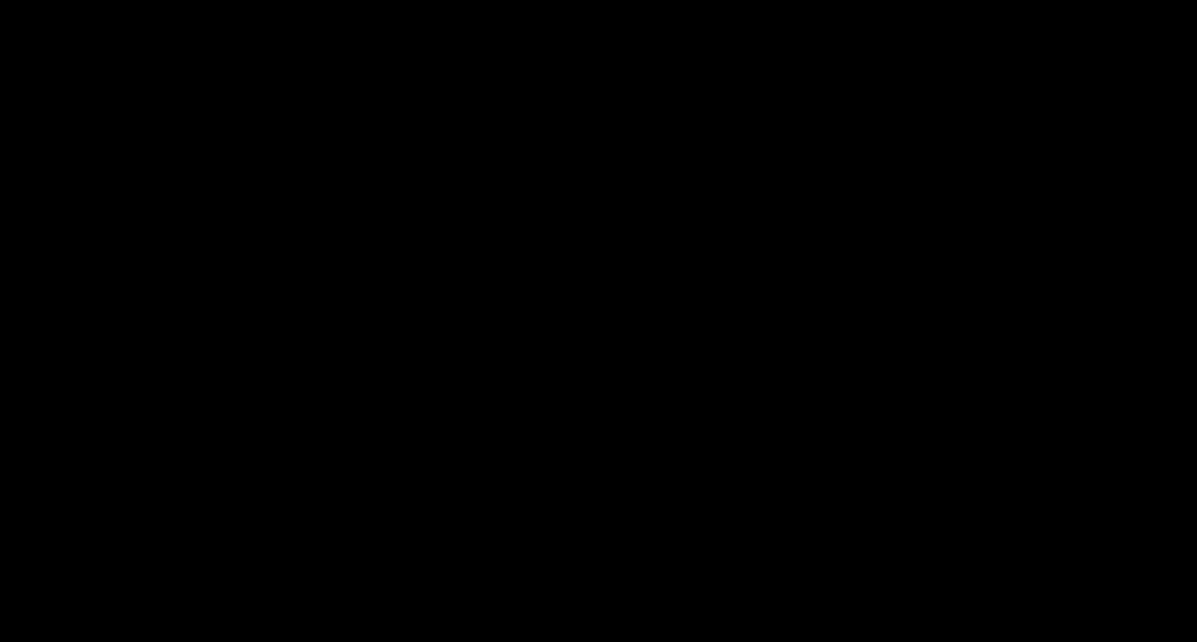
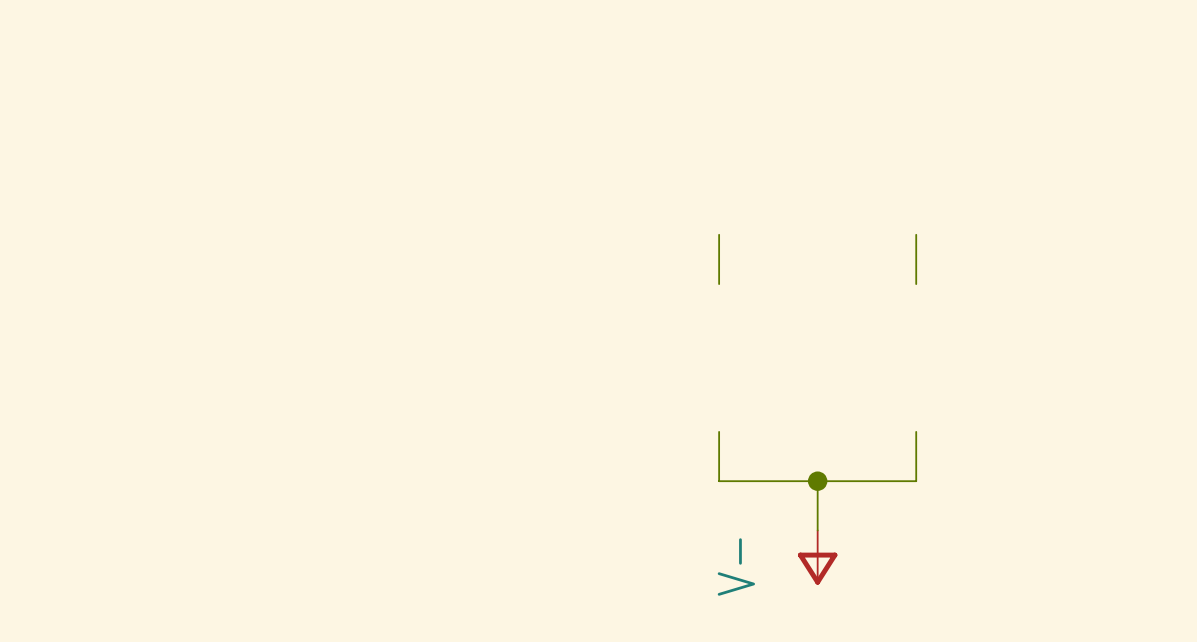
wire: none -> (719, 234) (719, 284)
wire: none -> (916, 234) (916, 284)
wire: none -> (719, 431) (719, 481) (916, 481) (916, 431)
wire: none -> (817, 481) (817, 530)
junction: none -> (817, 481)
power symbol: none -> V- (817, 557)

